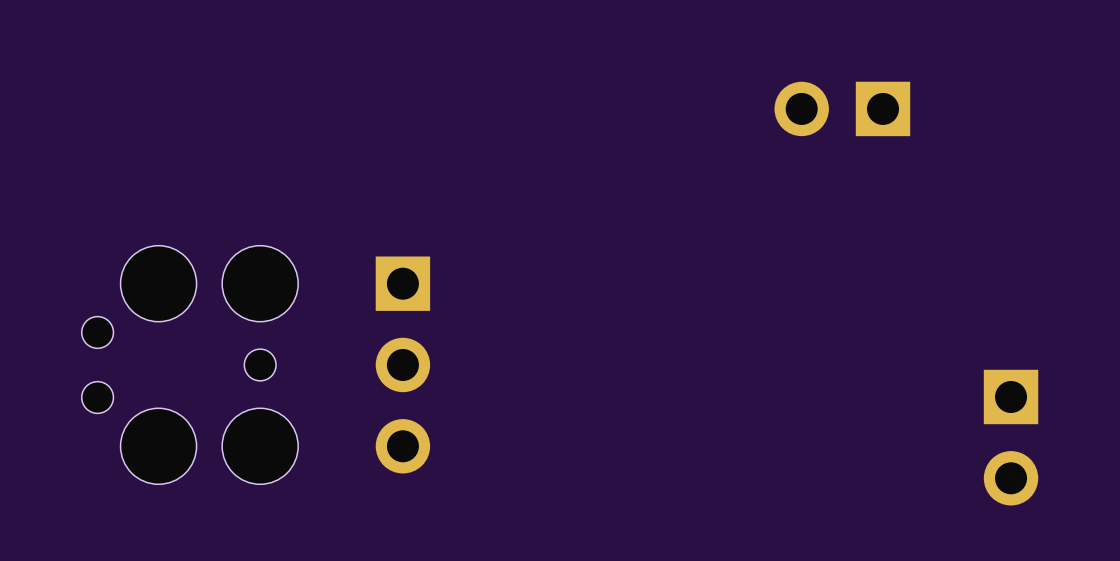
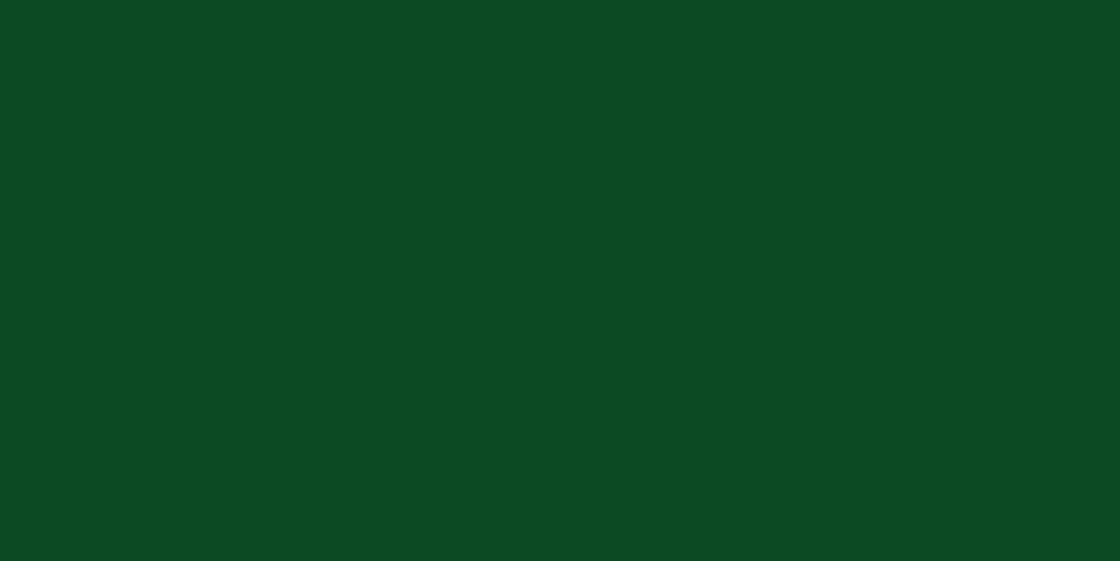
part: (842, 108) -> none
part: (189, 364) -> none
part: (402, 364) -> none
part: (1011, 437) -> none

